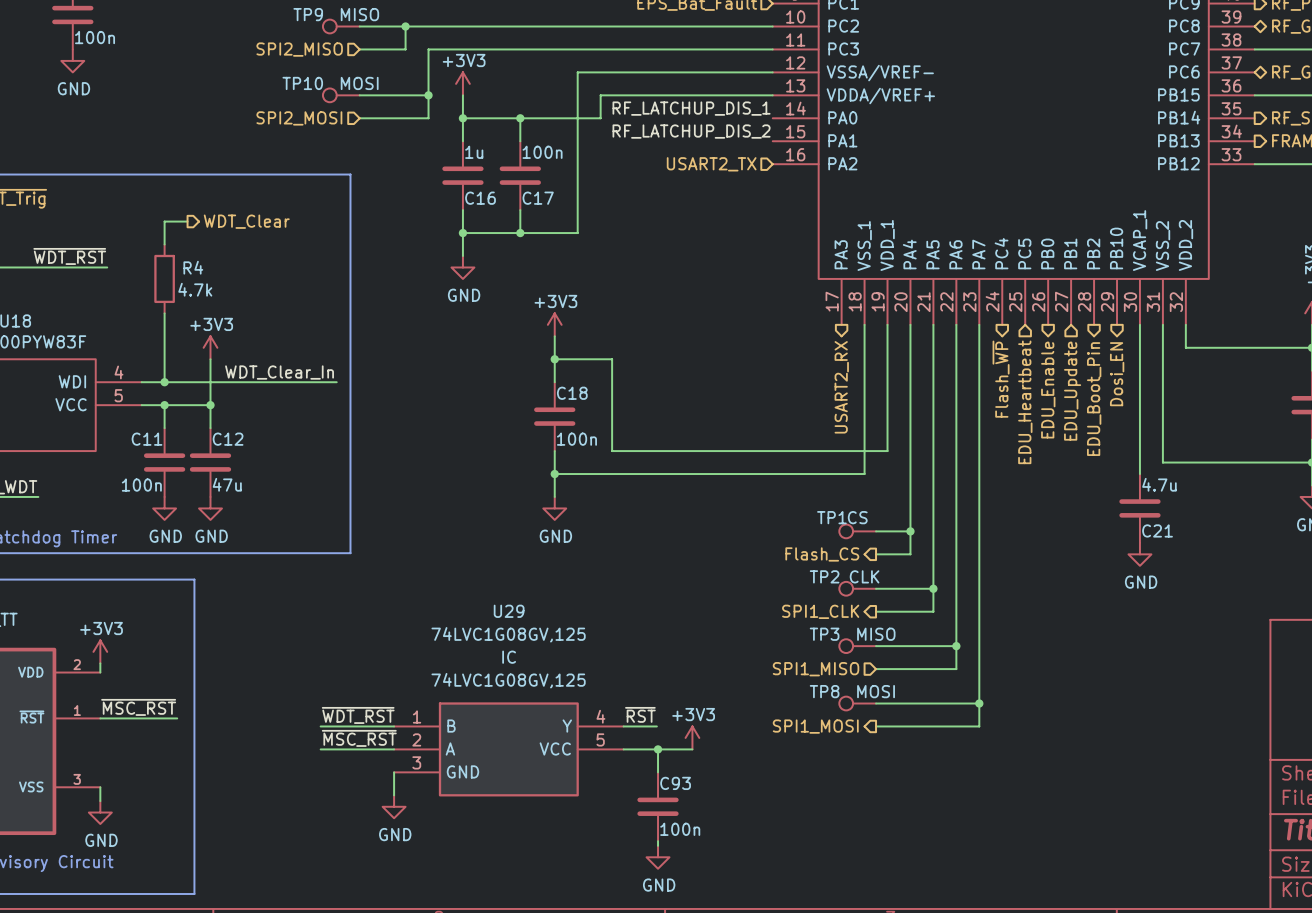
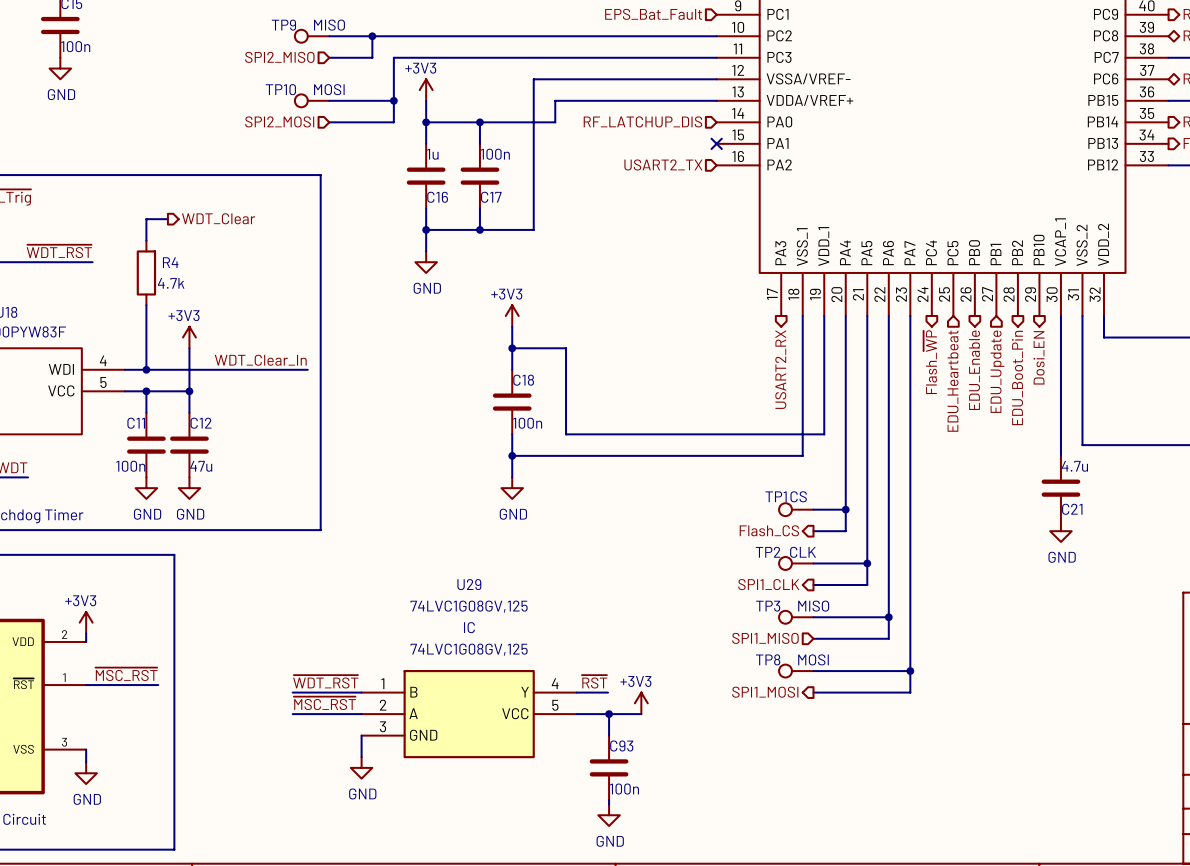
label: RF_LATCHUP_DIS_1 (691, 108) -> none
hierarchical label: none -> RF_LATCHUP_DIS (642, 121)
label: RF_LATCHUP_DIS_2 (691, 131) -> none
no-connect mark: none -> (716, 143)

